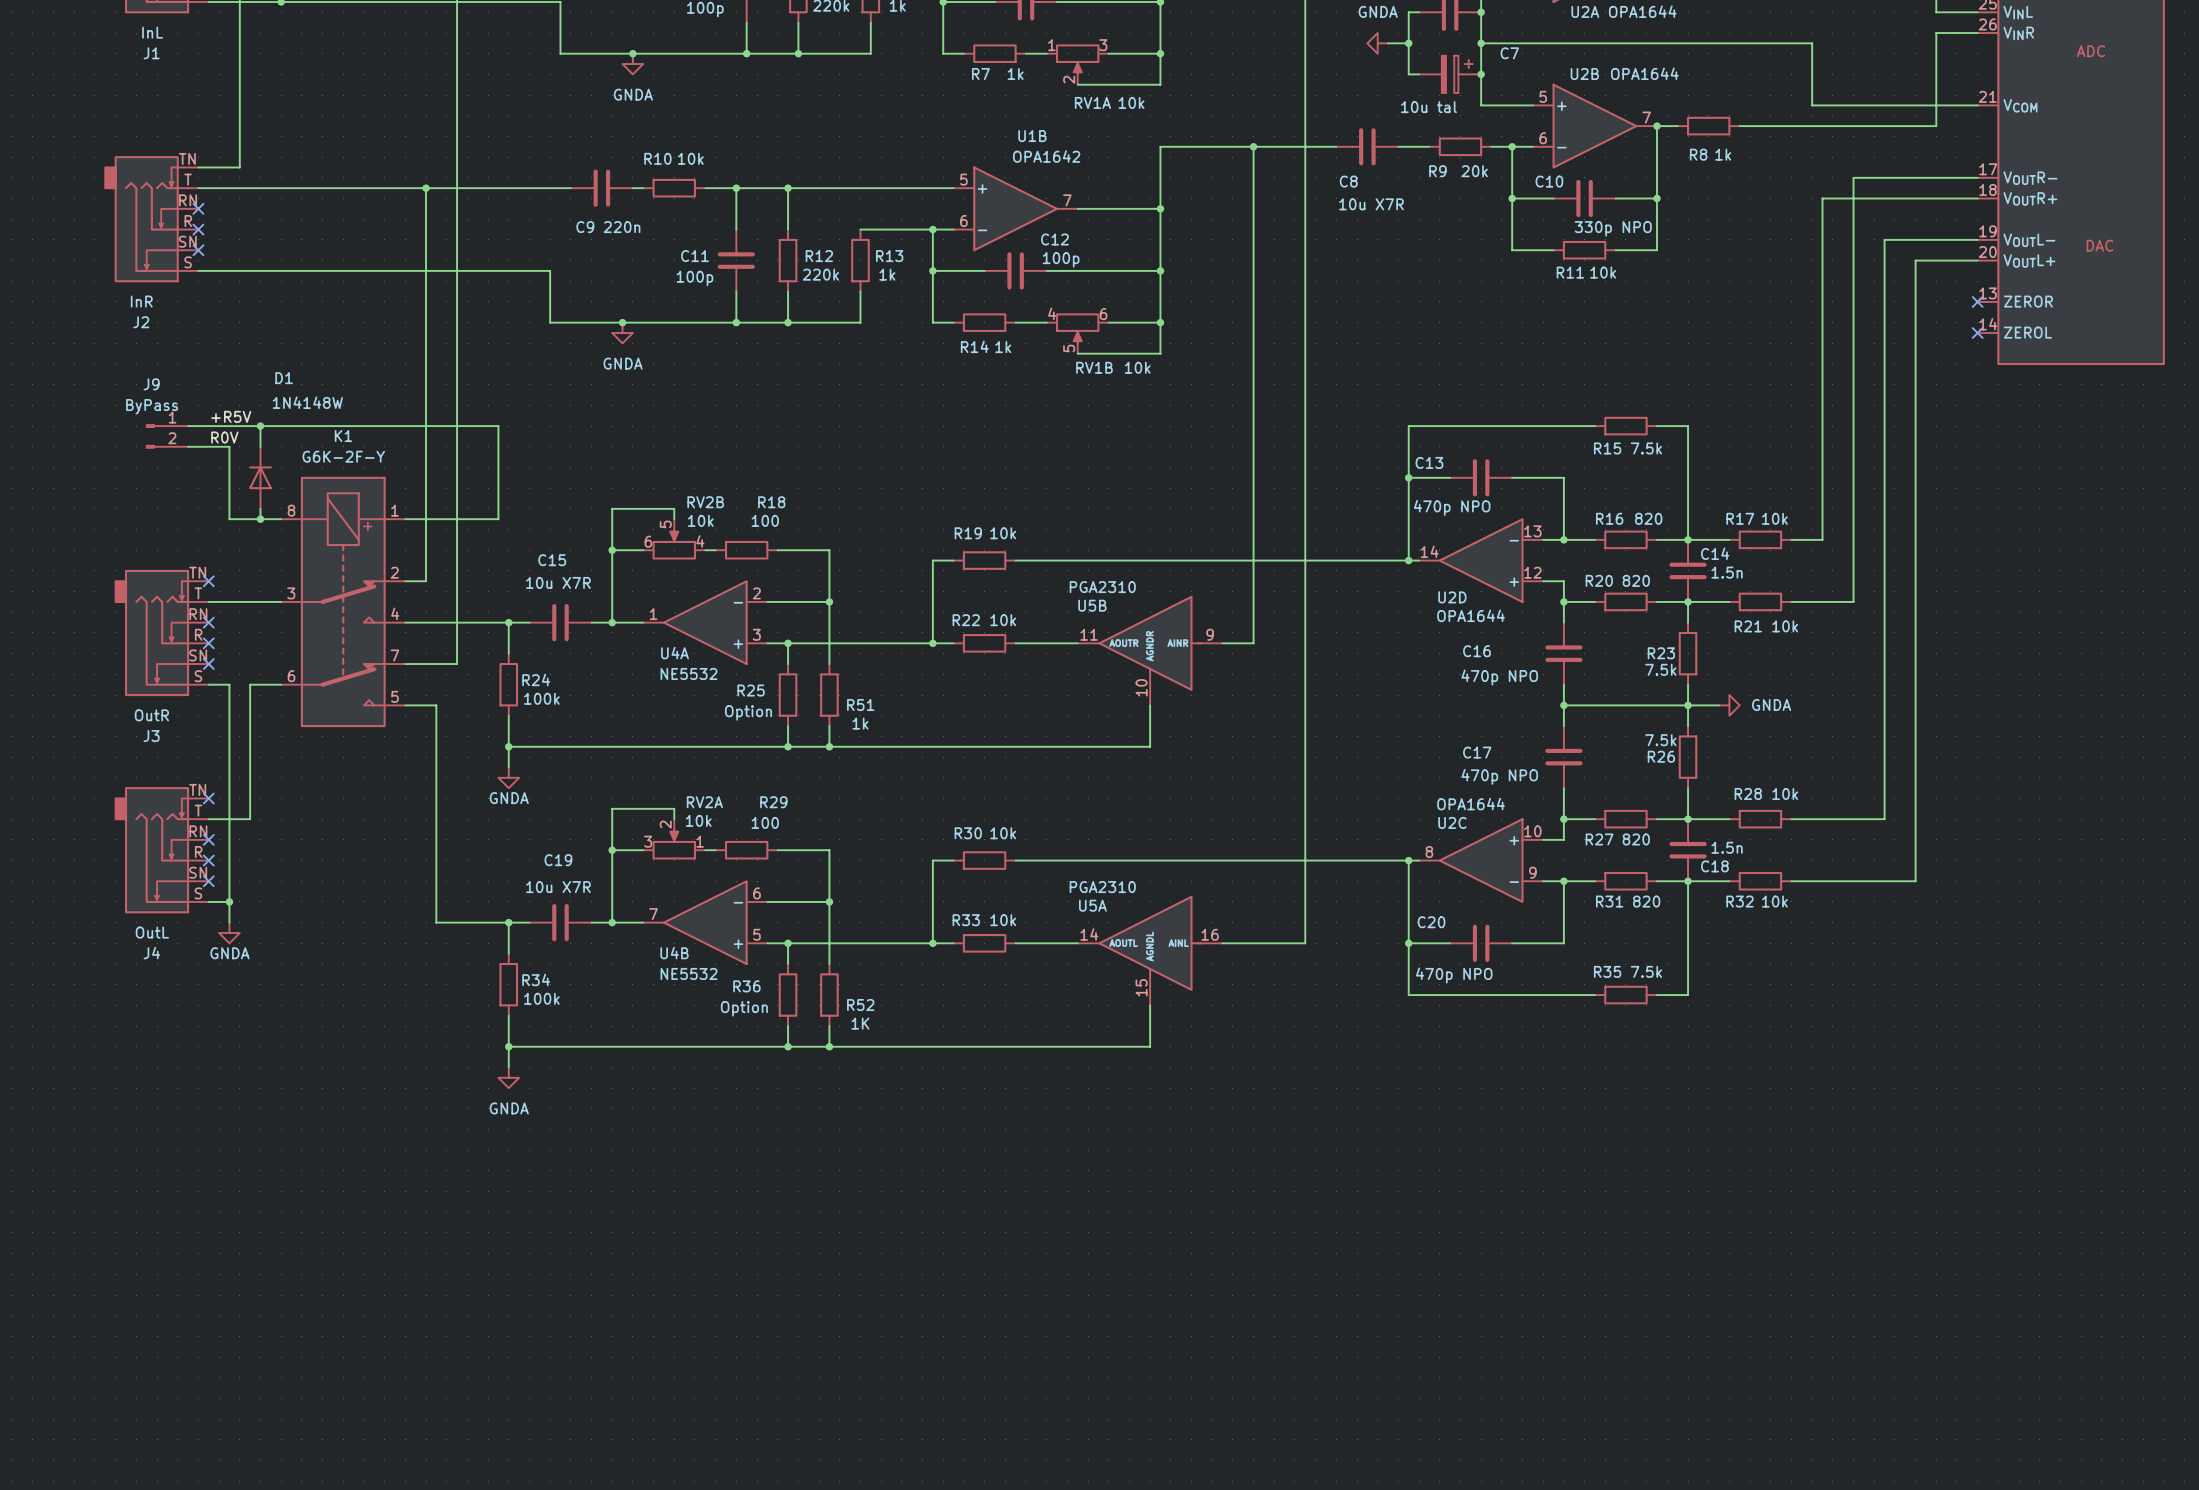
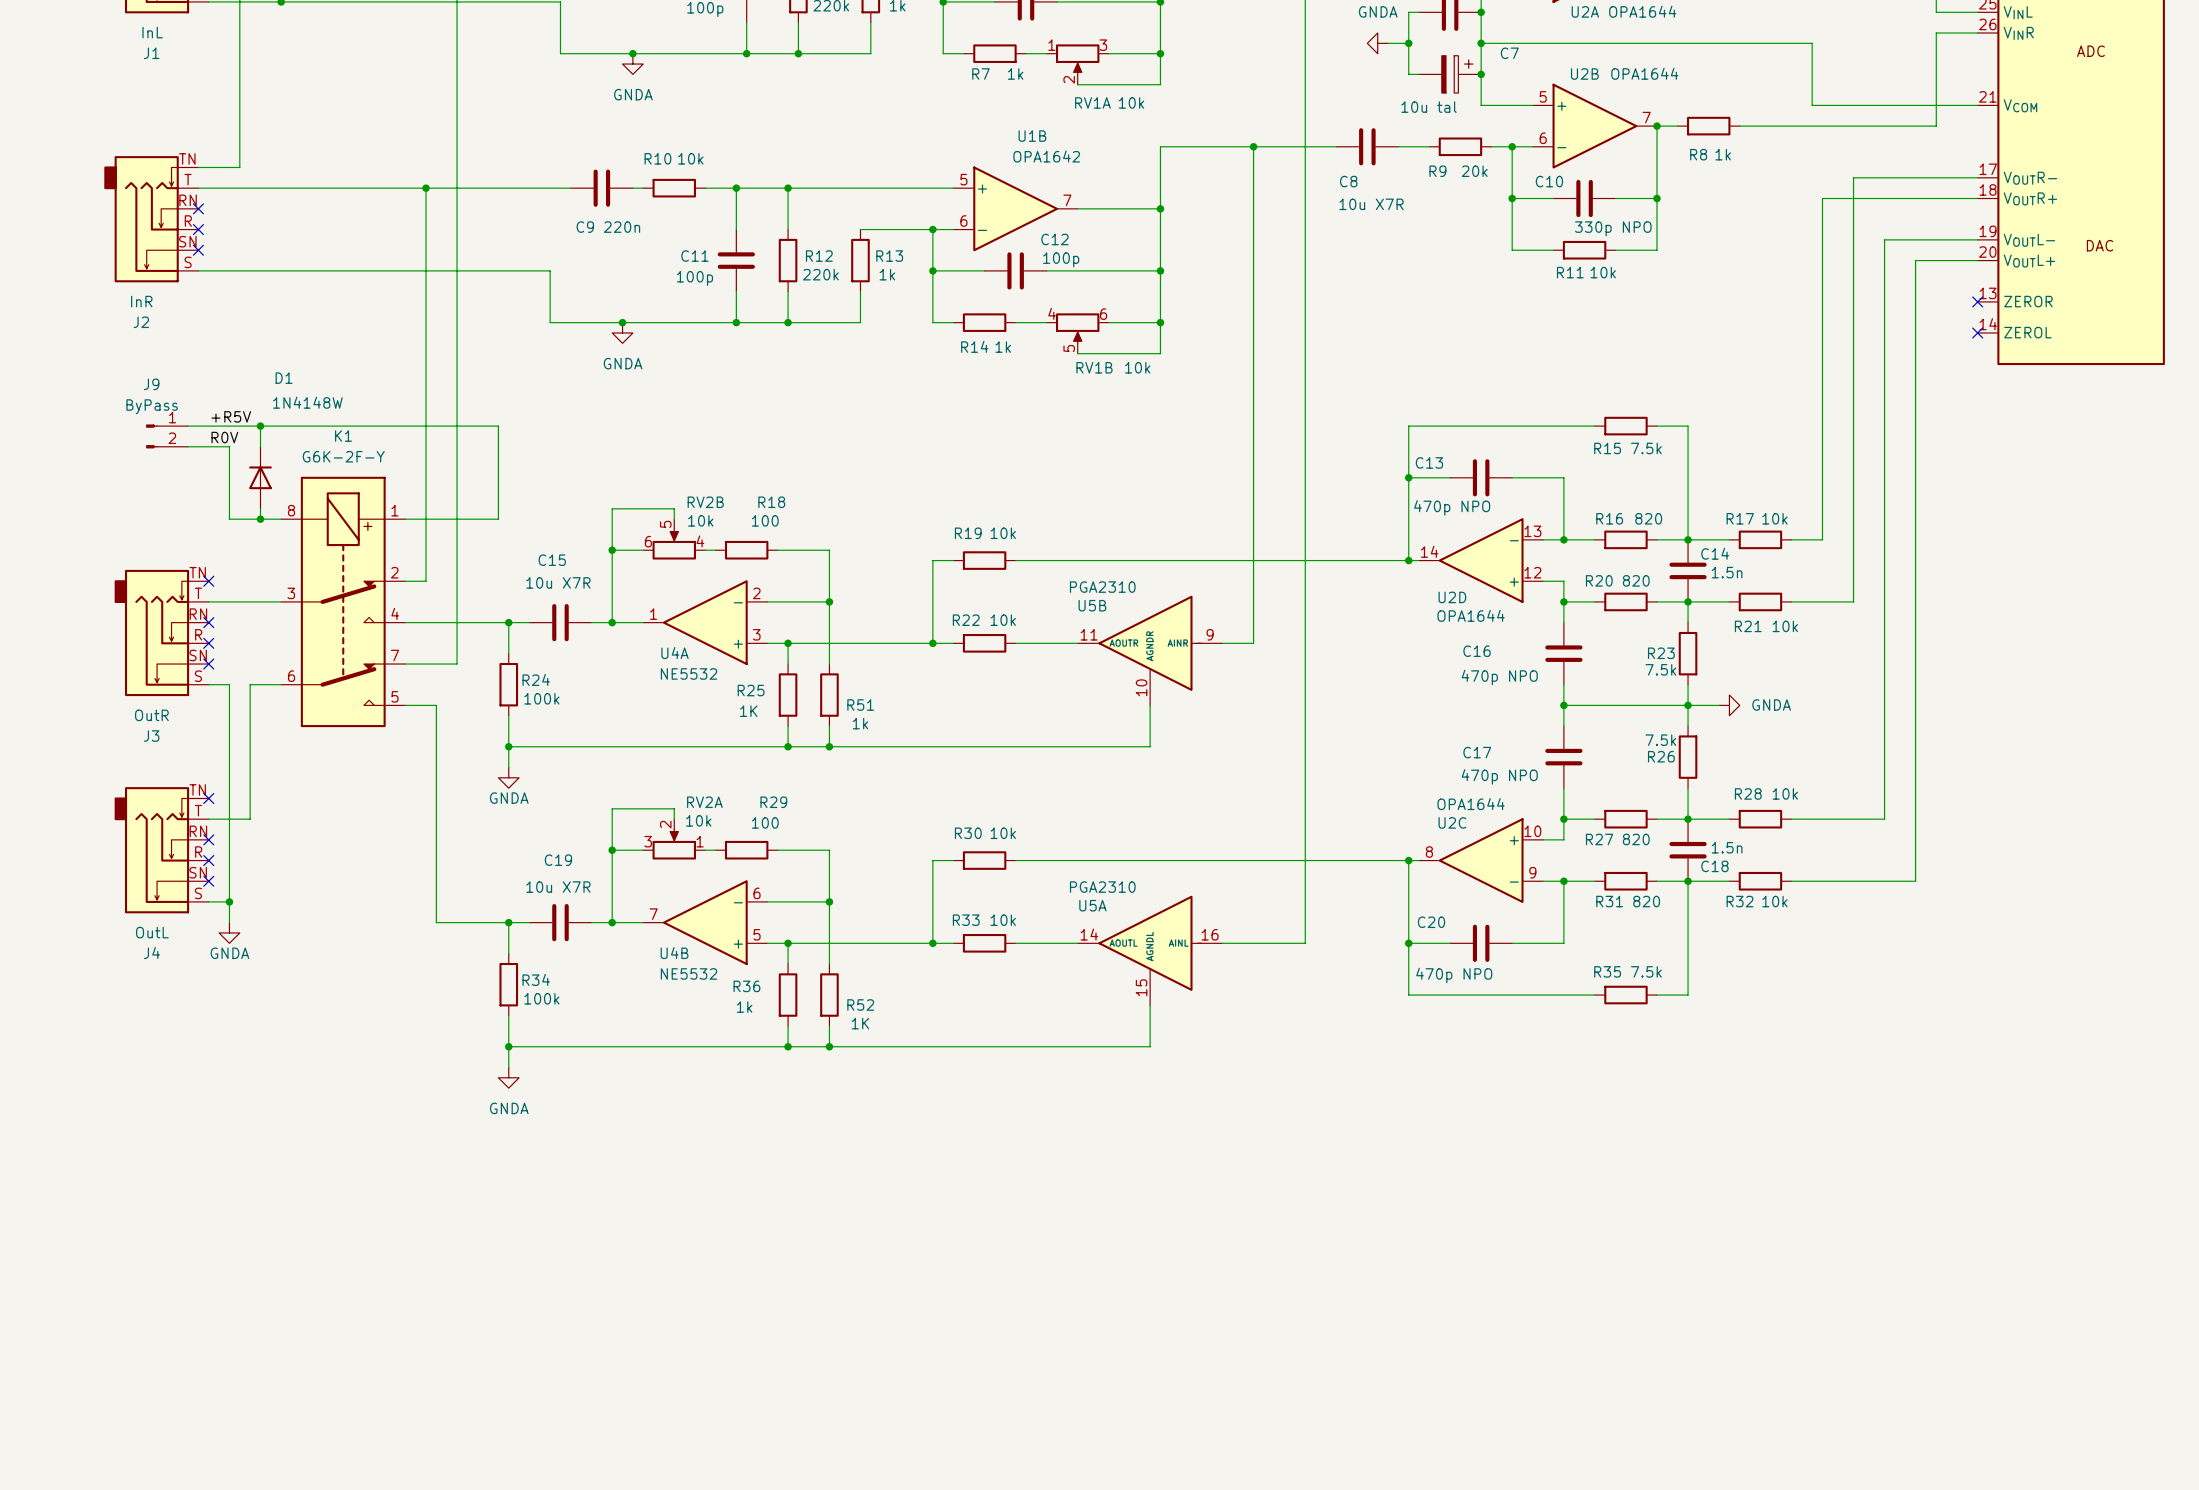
R25 value: Option (748, 712) -> 1K (748, 711)
R36 value: Option (744, 1008) -> 1k (744, 1007)

